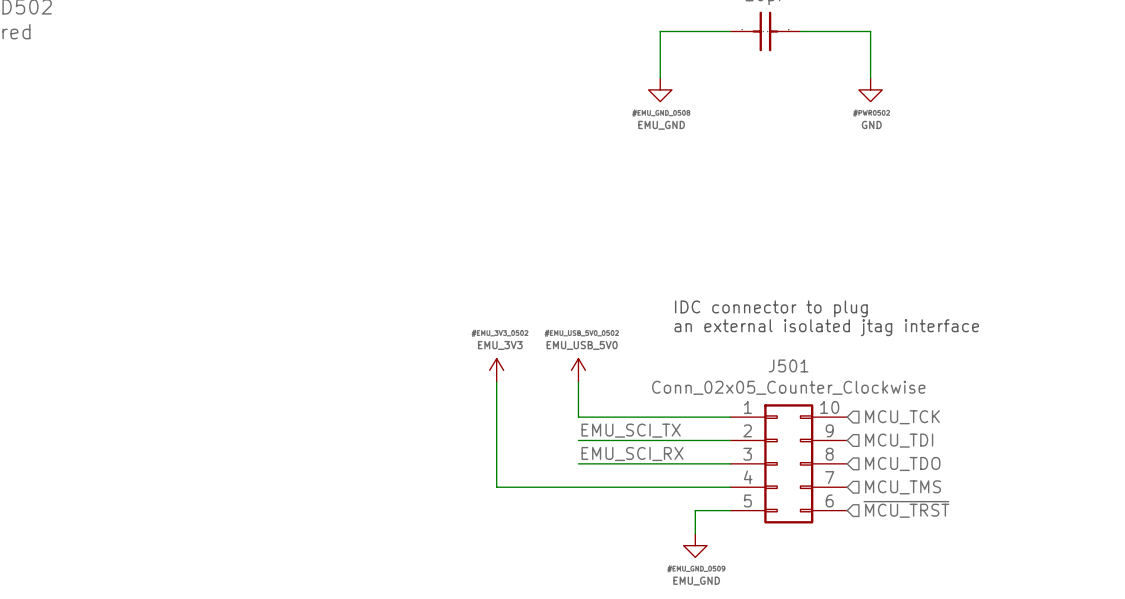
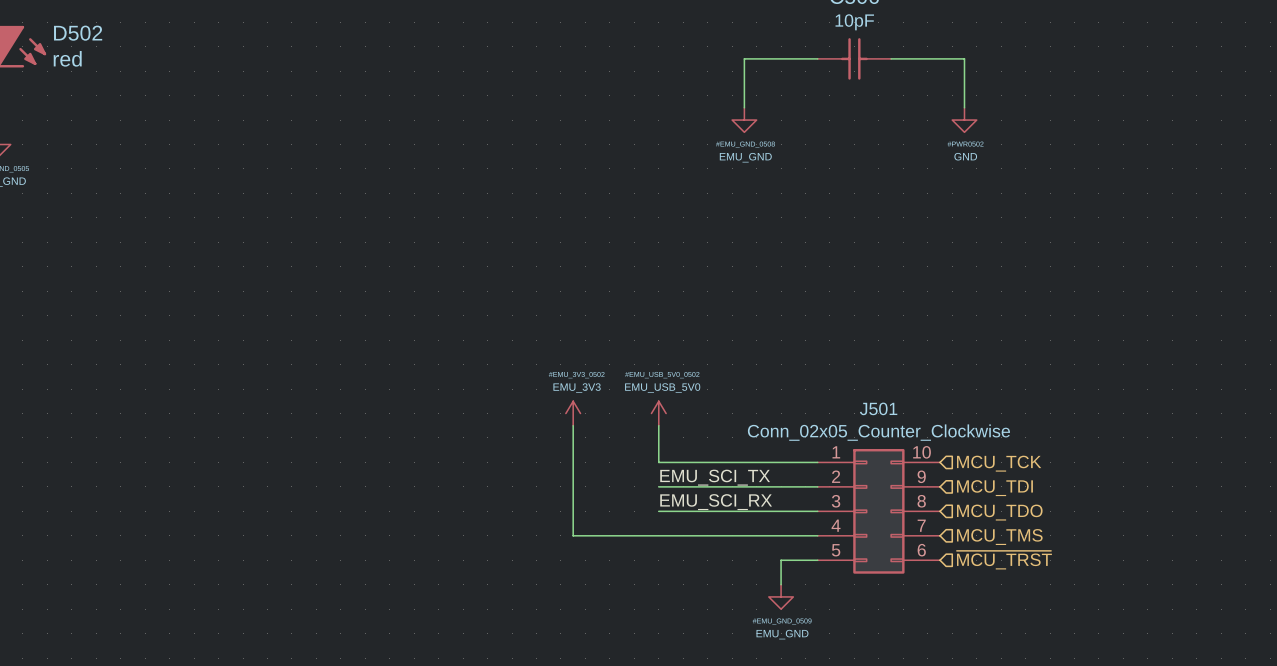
text: IDC connector to plug (771, 308) -> none
text: an external isolated jtag interface (826, 327) -> none

